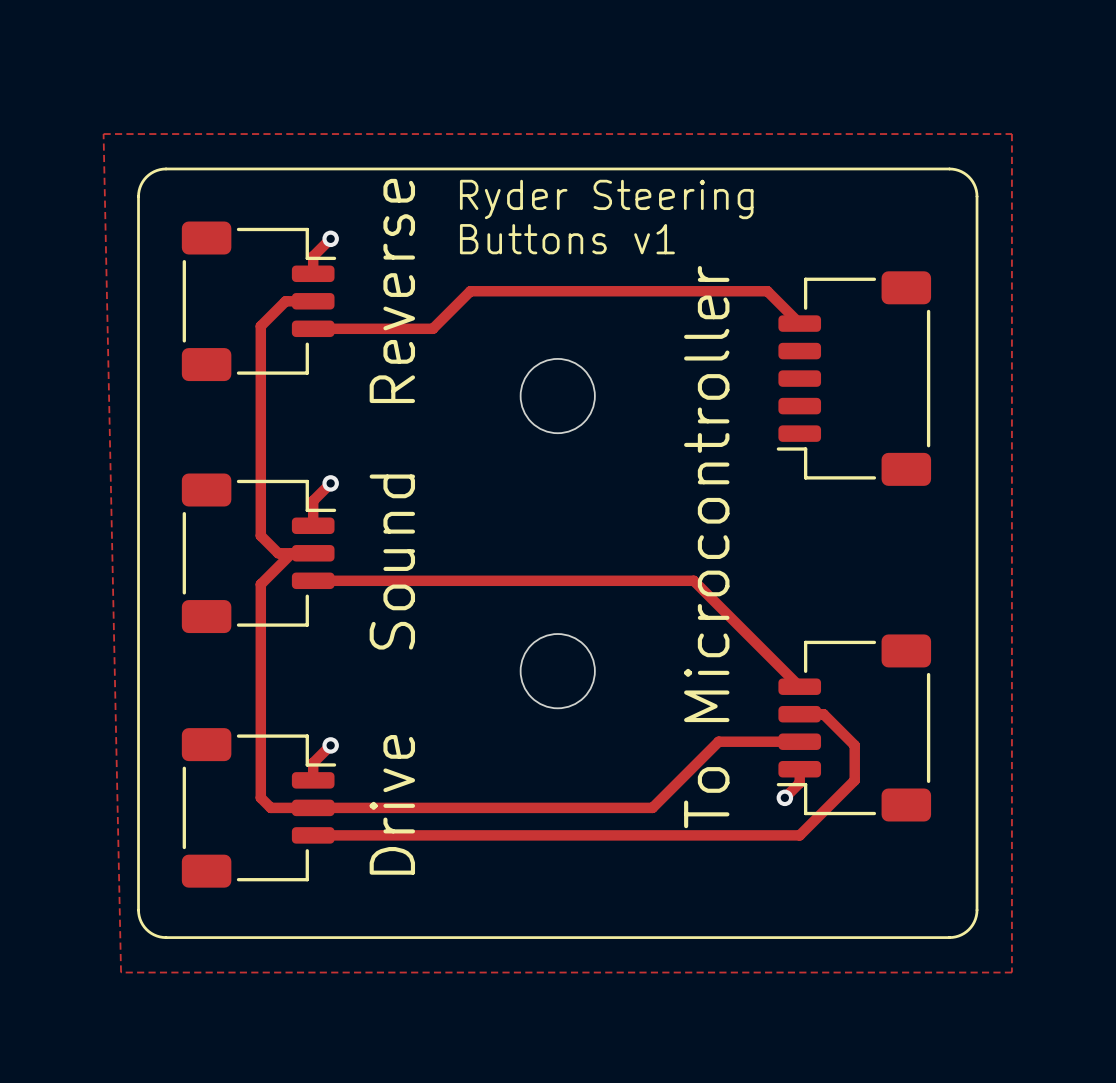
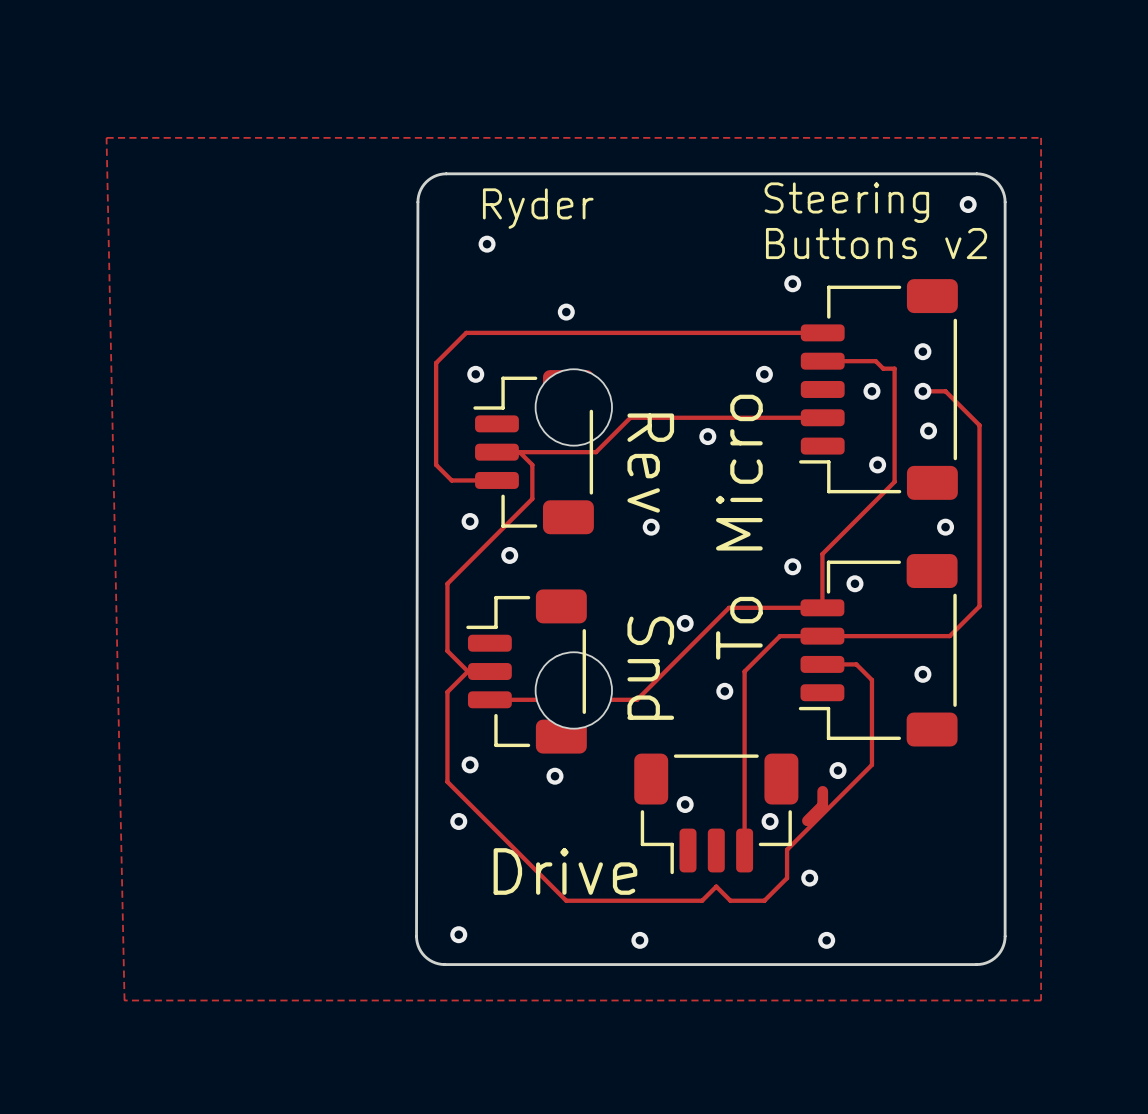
line: (166, 168) (949, 168) (961, 171) (968, 177) (974, 184) (977, 196) (977, 910) (975, 919) (968, 929) (958, 936) (949, 937) (166, 937) (154, 934) (146, 929) (140, 919) (138, 910) (138, 196) (140, 187) (146, 177) (156, 170) (166, 168) -> none
board edge: none -> (446, 173) (976, 173) (991, 178) (1000, 187) (1005, 202) (1005, 936) (1002, 948) (991, 960) (976, 964) (444, 964) (432, 961) (420, 951) (416, 936) (417, 202) (419, 192) (426, 182) (436, 175) (446, 173)
text: none -> Steering (846, 202)
via: none -> (968, 204)
text: Ryder Steering (606, 199) -> Ryder (538, 208)
text: none -> Buttons v2 (876, 243)
via: none -> (487, 244)
track: (330, 238) (313, 256) (313, 273) -> none
via: (330, 238) -> none
text: Buttons v1 (567, 239) -> none
via: none -> (792, 283)
text: Reverse (392, 290) -> none
part: (259, 301) -> none
track: (313, 301) (285, 301) (260, 326) (260, 535) (278, 553) (313, 553) -> none
via: none -> (566, 312)
track: (799, 323) (767, 291) (470, 291) (432, 328) (313, 328) -> (822, 332) (466, 332) (436, 363) (436, 464) (451, 480) (496, 480)
via: none -> (922, 351)
track: none -> (822, 361) (875, 361) (883, 368) (894, 368) (894, 481) (822, 554) (822, 607) (729, 607) (637, 699) (489, 699)
via: none -> (475, 374)
via: none -> (764, 374)
via: none -> (871, 391)
track: none -> (922, 391) (945, 391) (979, 425) (979, 606) (949, 636) (779, 636) (744, 671) (744, 850)
via: none -> (922, 391)
track: none -> (822, 417) (630, 417) (596, 452) (496, 452)
via: none -> (928, 430)
via: none -> (707, 436)
track: none -> (519, 452) (532, 464) (532, 498) (447, 583) (447, 650) (467, 671)
part: none -> (533, 452)
text: none -> Rev (650, 463)
via: none -> (877, 464)
track: (330, 483) (313, 500) (313, 525) -> none
via: (330, 483) -> none
via: none -> (470, 521)
via: none -> (651, 527)
via: none -> (945, 527)
via: none -> (509, 555)
text: To Microcontroller (706, 547) -> To Micro (739, 527)
via: none -> (792, 566)
part: (259, 553) -> none
track: (291, 553) (260, 584) (260, 797) (270, 807) (652, 807) (718, 741) (799, 741) -> none
text: Sound (392, 562) -> none
via: none -> (854, 583)
track: (313, 580) (693, 580) (799, 686) -> none
via: none -> (685, 623)
track: none -> (822, 664) (856, 664) (871, 679) (871, 764) (787, 849) (787, 878) (764, 900) (730, 900) (716, 886) (702, 900) (566, 900) (447, 781) (447, 692) (467, 671)
text: none -> Snd (650, 668)
part: none -> (526, 671)
via: none -> (922, 674)
via: none -> (724, 691)
track: (799, 714) (823, 714) (854, 745) (854, 780) (799, 835) (313, 835) -> none
part position: (853, 727) -> (878, 650)
via: none -> (470, 764)
track: (330, 745) (313, 762) (313, 780) -> none
via: (330, 745) -> none
via: none -> (838, 770)
via: none -> (554, 776)
via: none -> (685, 804)
part: none -> (716, 813)
via: (784, 797) -> none
via: none -> (458, 821)
via: none -> (770, 821)
text rotation: 0° (392, 804) -> 90° clockwise (565, 871)
part: (259, 807) -> none
via: none -> (809, 878)
via: none -> (458, 934)
via: none -> (639, 940)
via: none -> (826, 940)

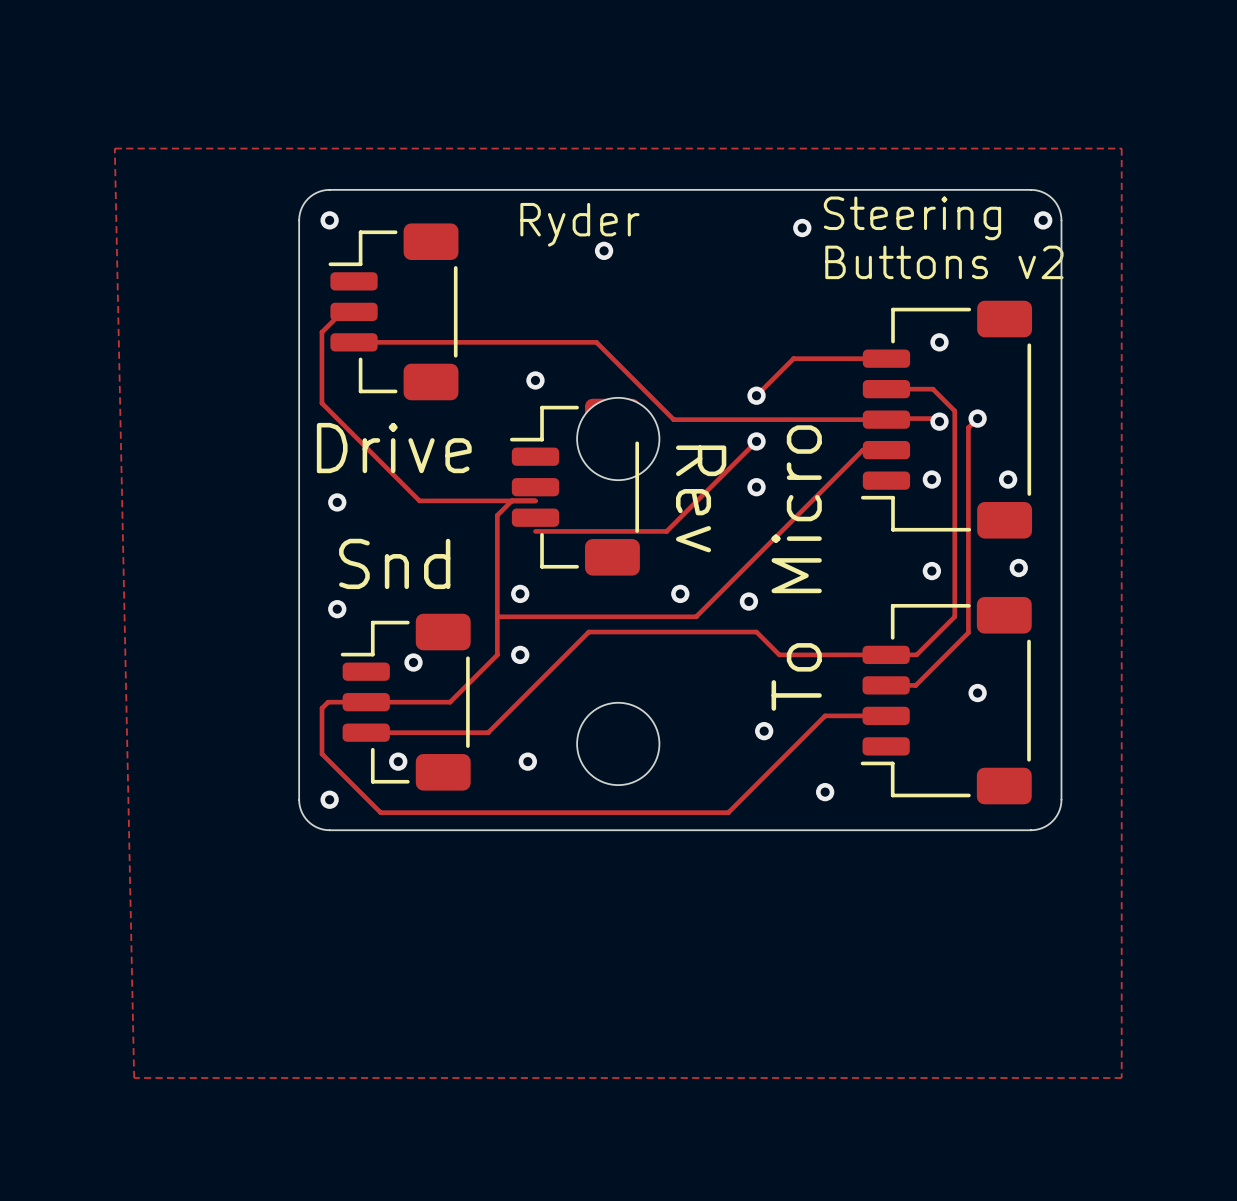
board edge: (446, 173) (976, 173) (991, 178) (1000, 187) (1005, 202) (1005, 936) (1002, 948) (991, 960) (976, 964) (444, 964) (432, 961) (420, 951) (416, 936) (417, 202) (419, 192) (426, 182) (436, 175) (446, 173) -> (329, 189) (316, 192) (308, 198) (300, 210) (299, 220) (299, 799) (302, 812) (310, 823) (319, 828) (329, 830) (1030, 830) (1044, 827) (1054, 818) (1059, 809) (1061, 799) (1061, 220) (1058, 207) (1050, 196) (1041, 191) (1030, 189) (329, 189)
via: none -> (329, 220)
via: none -> (802, 227)
via: none -> (604, 250)
via: (487, 244) -> none
via: (792, 283) -> none
track: none -> (354, 311) (342, 311) (321, 332) (321, 403) (419, 500) (535, 500)
part: none -> (393, 311)
via: (566, 312) -> none
track: none -> (354, 342) (596, 342) (673, 419) (931, 418)
via: none -> (939, 342)
track: (736, 332) (466, 332) (436, 363) (436, 464) (451, 480) (496, 480) -> (793, 358) (756, 395)
via: (922, 351) -> none
track: (865, 361) (875, 361) (883, 368) (894, 368) (894, 481) (822, 554) (822, 607) -> (932, 389) (954, 410) (954, 616) (916, 654) (886, 654)
via: none -> (756, 395)
via position: (475, 374) -> (535, 380)
via: (764, 374) -> none
track: (922, 391) (945, 391) (979, 425) (979, 606) (949, 636) (849, 636) -> (977, 418) (968, 427) (968, 632) (915, 685)
via position: (922, 391) -> (977, 418)
track: none -> (756, 441) (666, 531) (535, 531)
via: none -> (756, 441)
track: (800, 417) (630, 417) (596, 452) (496, 452) -> (862, 450) (696, 616) (497, 616)
via position: (928, 430) -> (1008, 479)
via position: (707, 436) -> (756, 487)
track: (519, 452) (532, 464) (532, 498) (447, 583) (447, 650) (467, 671) -> none
via position: (877, 464) -> (931, 479)
via: none -> (337, 502)
via: (470, 521) -> none
via: (651, 527) -> none
via: none -> (931, 571)
via: none -> (520, 593)
via: none -> (680, 593)
via: (509, 555) -> none
via: none -> (748, 601)
via: none -> (337, 609)
via: (792, 566) -> none
via: (854, 583) -> none
via: none -> (520, 654)
track: (729, 607) (637, 699) (489, 699) -> (785, 654) (779, 654) (756, 632) (588, 632) (488, 732) (366, 732)
via: none -> (413, 662)
via: (685, 623) -> none
track: (822, 636) (779, 636) (744, 671) (744, 850) -> none
track: (822, 664) (856, 664) (871, 679) (871, 764) (787, 849) (787, 878) (764, 900) (730, 900) (716, 886) (702, 900) (566, 900) (447, 781) (447, 692) (467, 671) -> (886, 715) (825, 715) (728, 812) (380, 812) (322, 754) (322, 708) (328, 702) (450, 702) (497, 654) (497, 515) (511, 500)
text rotation: 0° (650, 668) -> 90° counterclockwise (394, 563)
text position: Snd (650, 668) -> Snd (394, 563)
part position: (526, 671) -> (405, 702)
via position: (922, 674) -> (977, 693)
via position: (724, 691) -> (764, 731)
via: none -> (398, 761)
via: none -> (527, 761)
via: none -> (825, 792)
via: none -> (329, 799)
via: (470, 764) -> none
via: (838, 770) -> none
via: (554, 776) -> none
track: (822, 791) (822, 805) (807, 820) -> none
via: (685, 804) -> none
part: (716, 813) -> none
via: (458, 821) -> none
via: (770, 821) -> none
text position: Drive (565, 871) -> Drive (394, 448)
via: (809, 878) -> none
via: (458, 934) -> none
via: (639, 940) -> none
via: (826, 940) -> none

